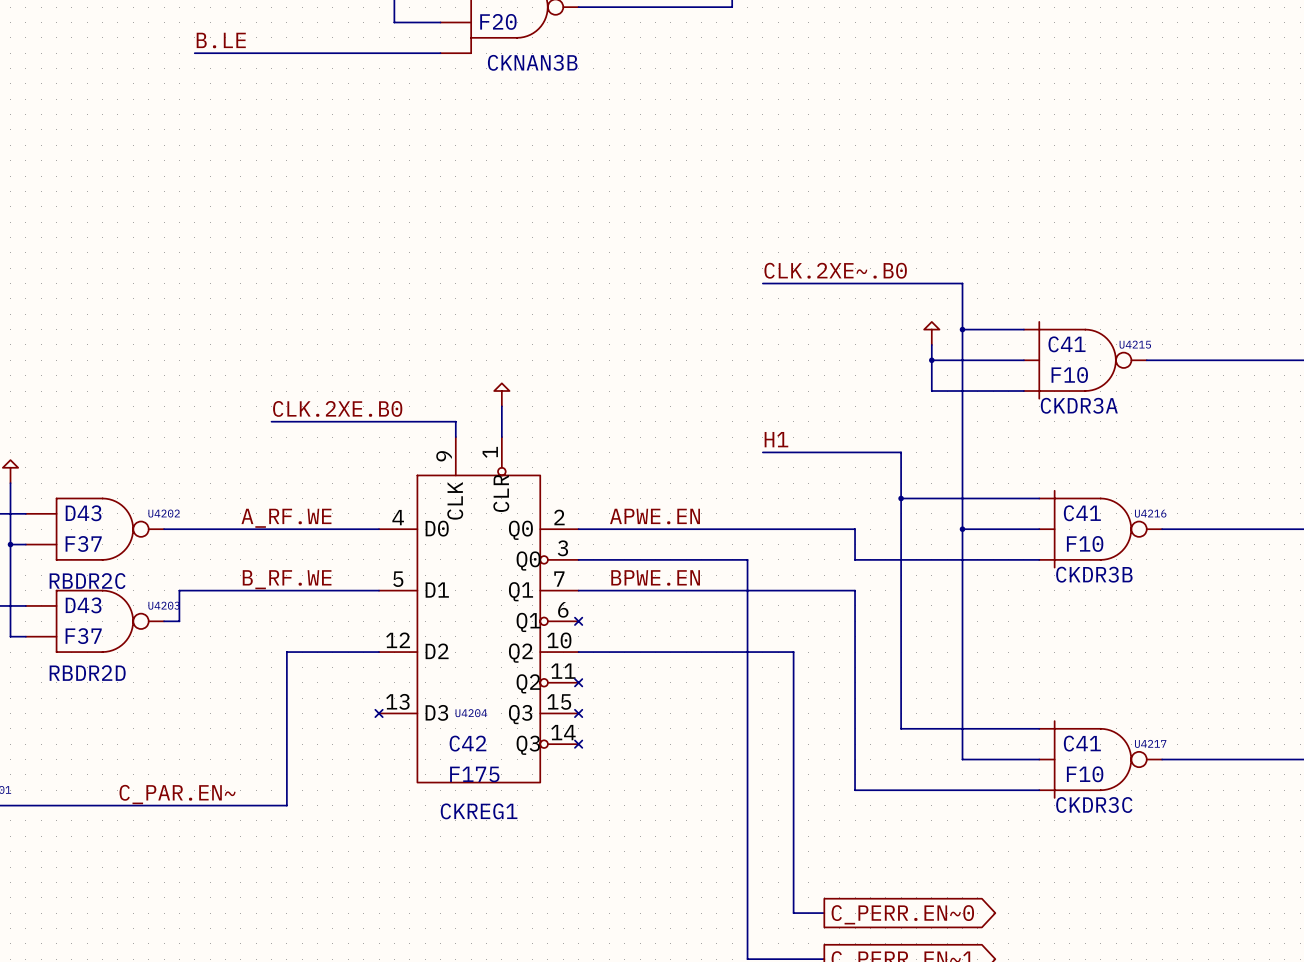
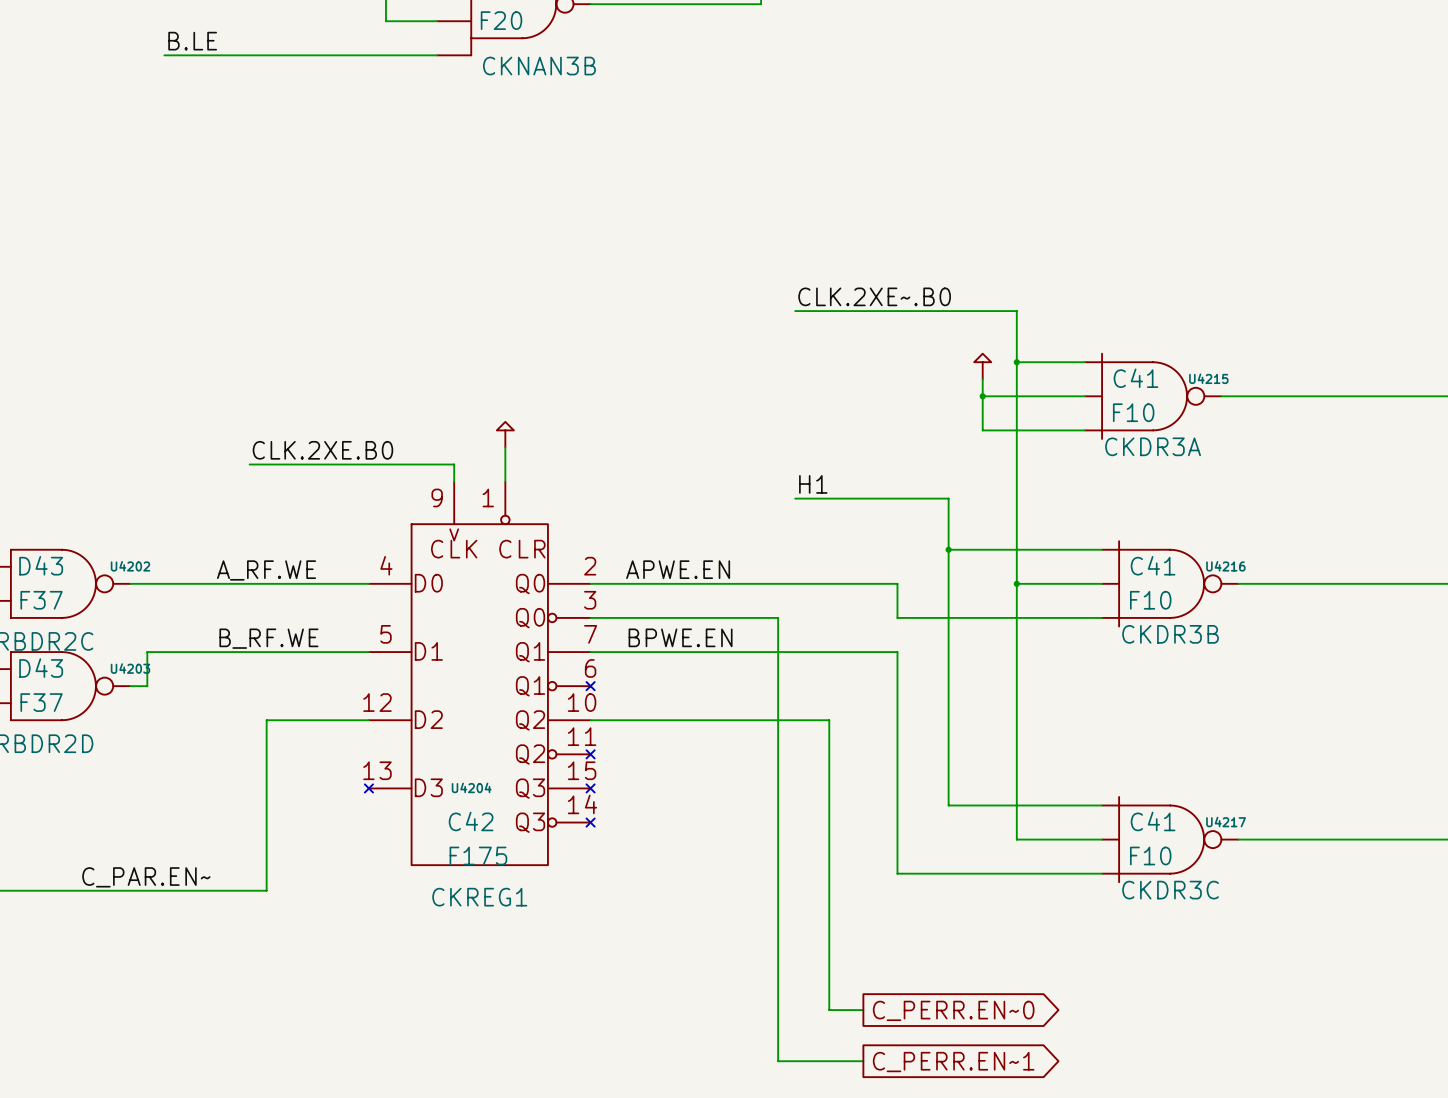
U4204 symbol: [379, 437, 579, 783] -> [368, 481, 591, 866]

